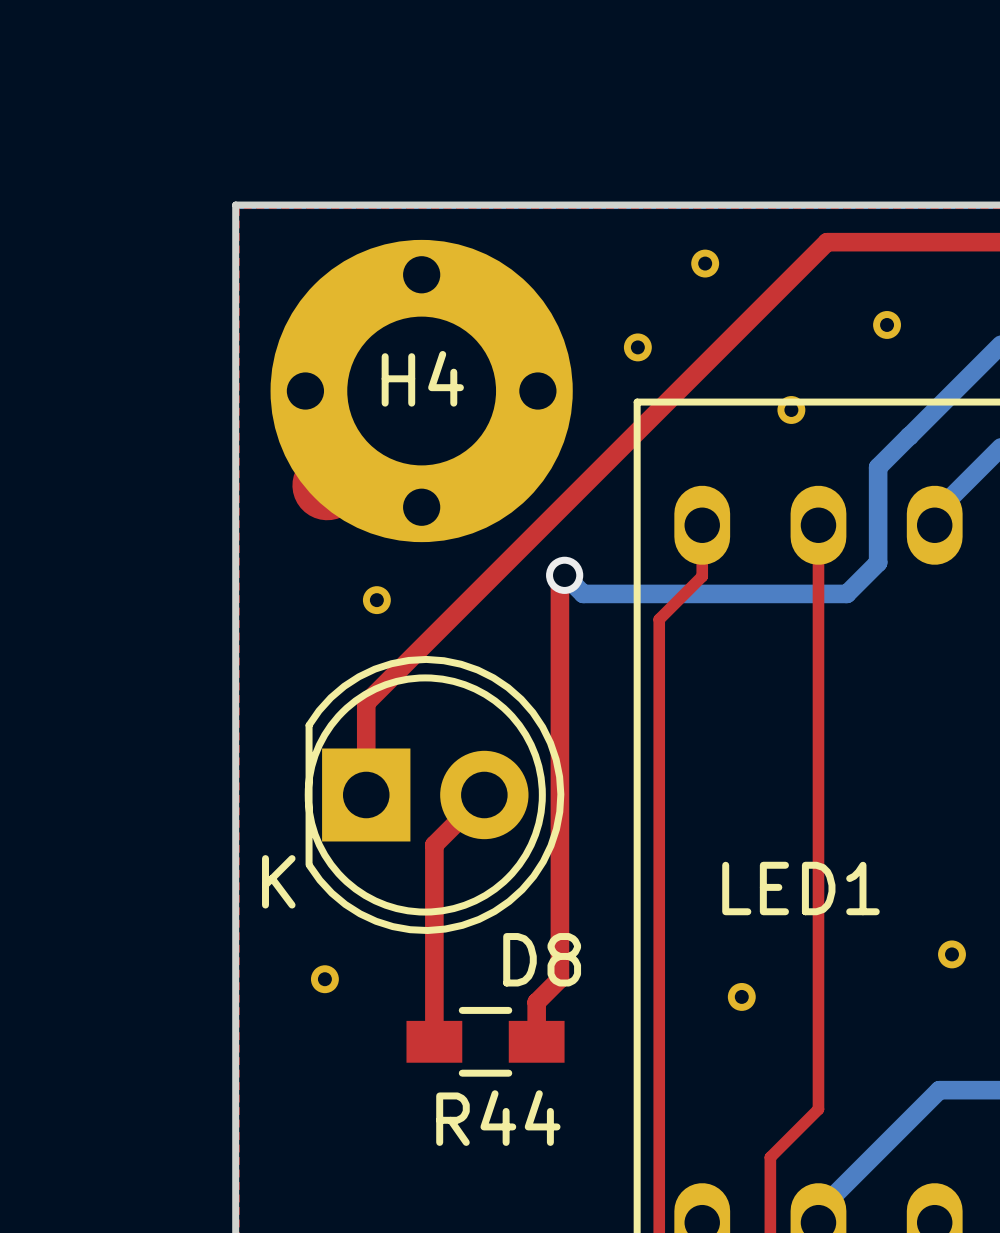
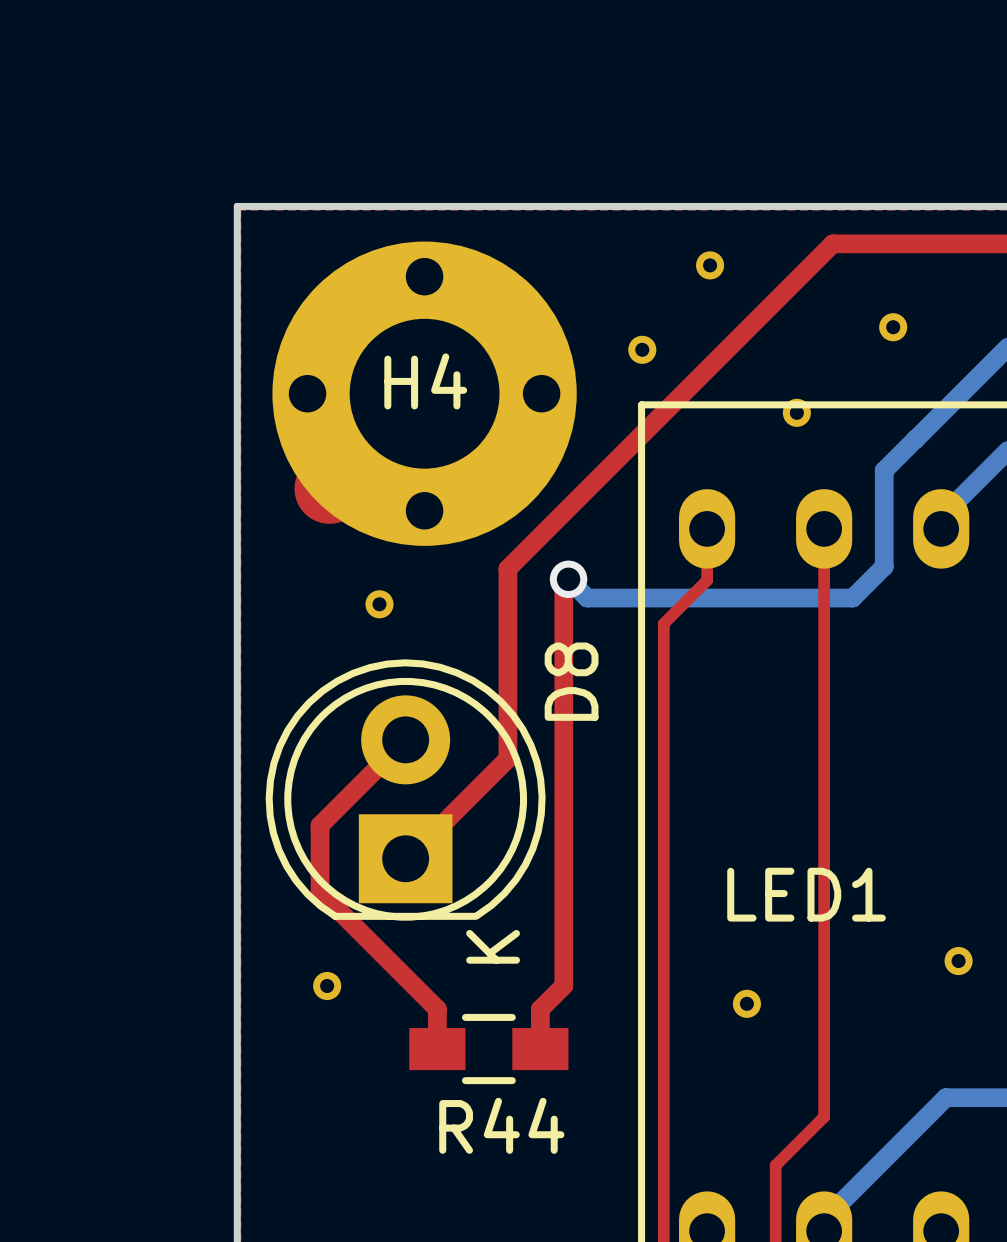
top track: (504, 564) (366, 703) (366, 794) -> (507, 568) (507, 758) (407, 858) (405, 858)
D8 rotation: 0° (434, 794) -> 90° counterclockwise (405, 790)
top track: (484, 794) (434, 844) (434, 1002) -> (405, 739) (320, 825) (320, 891) (437, 1009)

